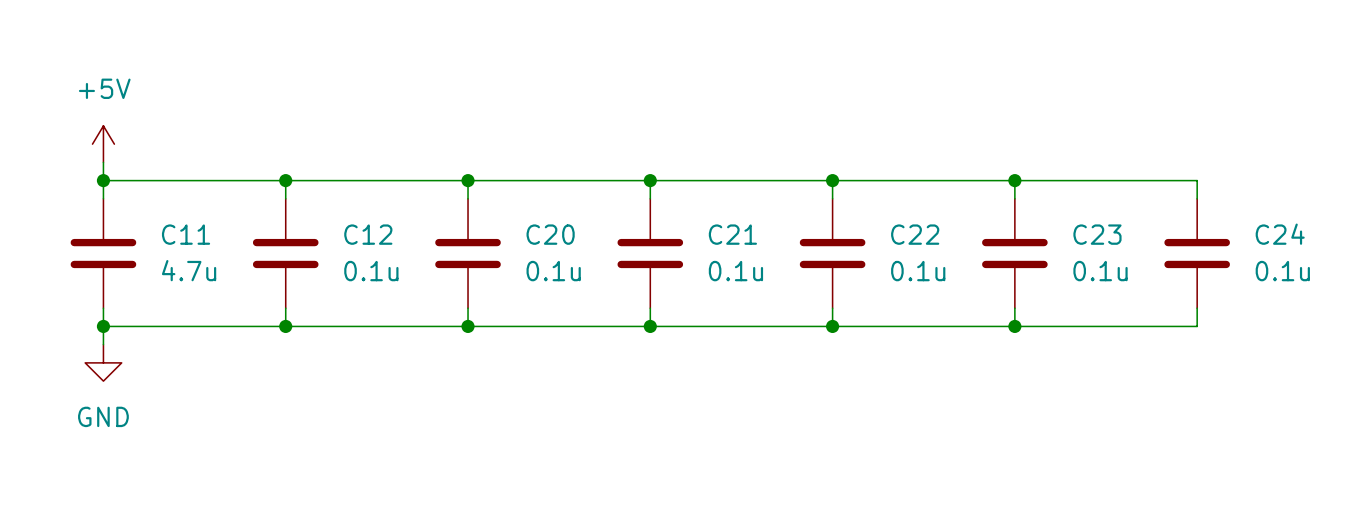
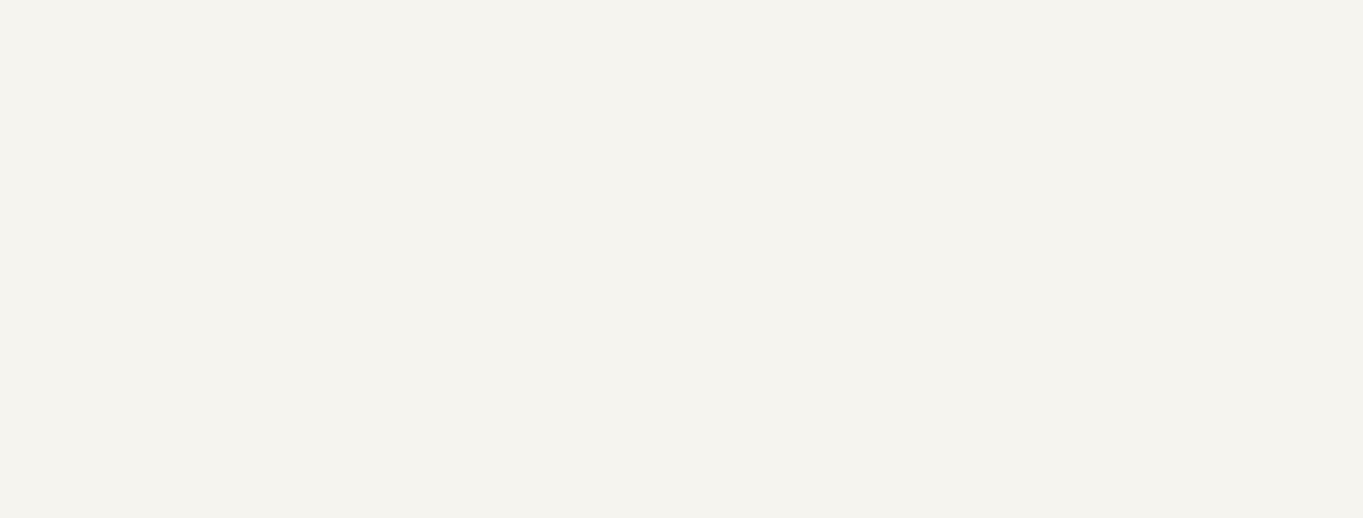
power symbol: +5V (103, 144) -> none
wire: (103, 162) (103, 198) -> none
wire: (103, 180) (1197, 180) (1197, 198) -> none
junction: (103, 180) -> none
wire: (285, 180) (285, 198) -> none
junction: (285, 180) -> none
wire: (468, 180) (468, 198) -> none
junction: (468, 180) -> none
wire: (650, 180) (650, 198) -> none
junction: (650, 180) -> none
wire: (832, 180) (832, 198) -> none
junction: (832, 180) -> none
wire: (1014, 180) (1014, 198) -> none
junction: (1014, 180) -> none
C11: 4.7u (103, 253) -> none
C12: 0.1u (285, 253) -> none
C20: 0.1u (468, 253) -> none
C21: 0.1u (650, 253) -> none
C22: 0.1u (832, 253) -> none
C23: 0.1u (1014, 253) -> none
C24: 0.1u (1197, 253) -> none
wire: (103, 308) (103, 344) -> none
wire: (285, 308) (285, 326) -> none
wire: (468, 308) (468, 326) -> none
wire: (650, 308) (650, 326) -> none
wire: (832, 308) (832, 326) -> none
wire: (1014, 308) (1014, 326) -> none
wire: (1197, 308) (1197, 326) (103, 326) -> none
junction: (103, 326) -> none
junction: (285, 326) -> none
junction: (468, 326) -> none
junction: (650, 326) -> none
junction: (832, 326) -> none
junction: (1014, 326) -> none
power symbol: GND (103, 362) -> none

